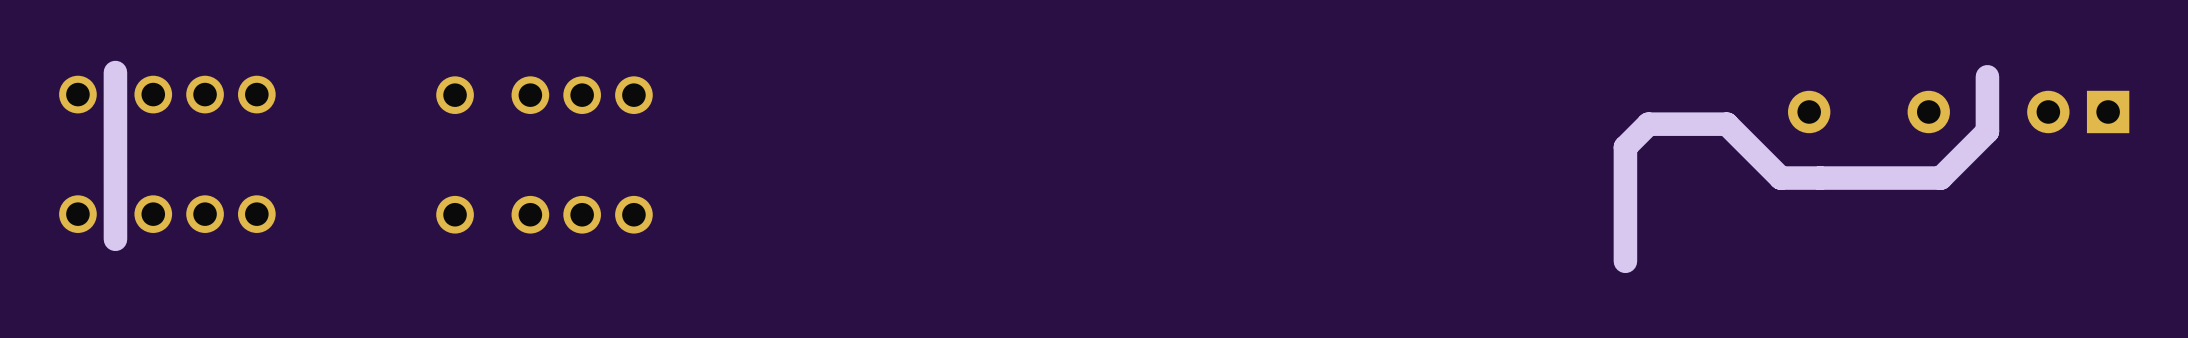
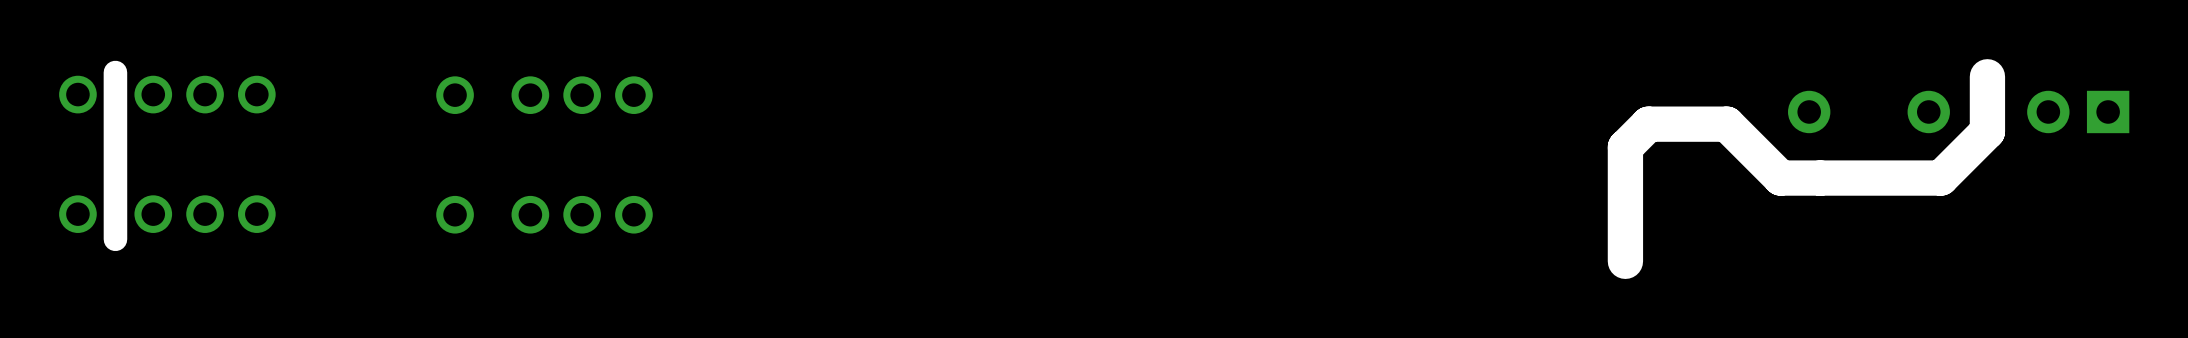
board edge width: thin (1987, 76) (1987, 131) (1940, 178) (1780, 178) (1726, 124) (1648, 124) (1625, 147) (1625, 261) -> thick (1987, 76) (1987, 131) (1940, 178) (1780, 178) (1726, 124) (1648, 124) (1625, 147) (1625, 261)

